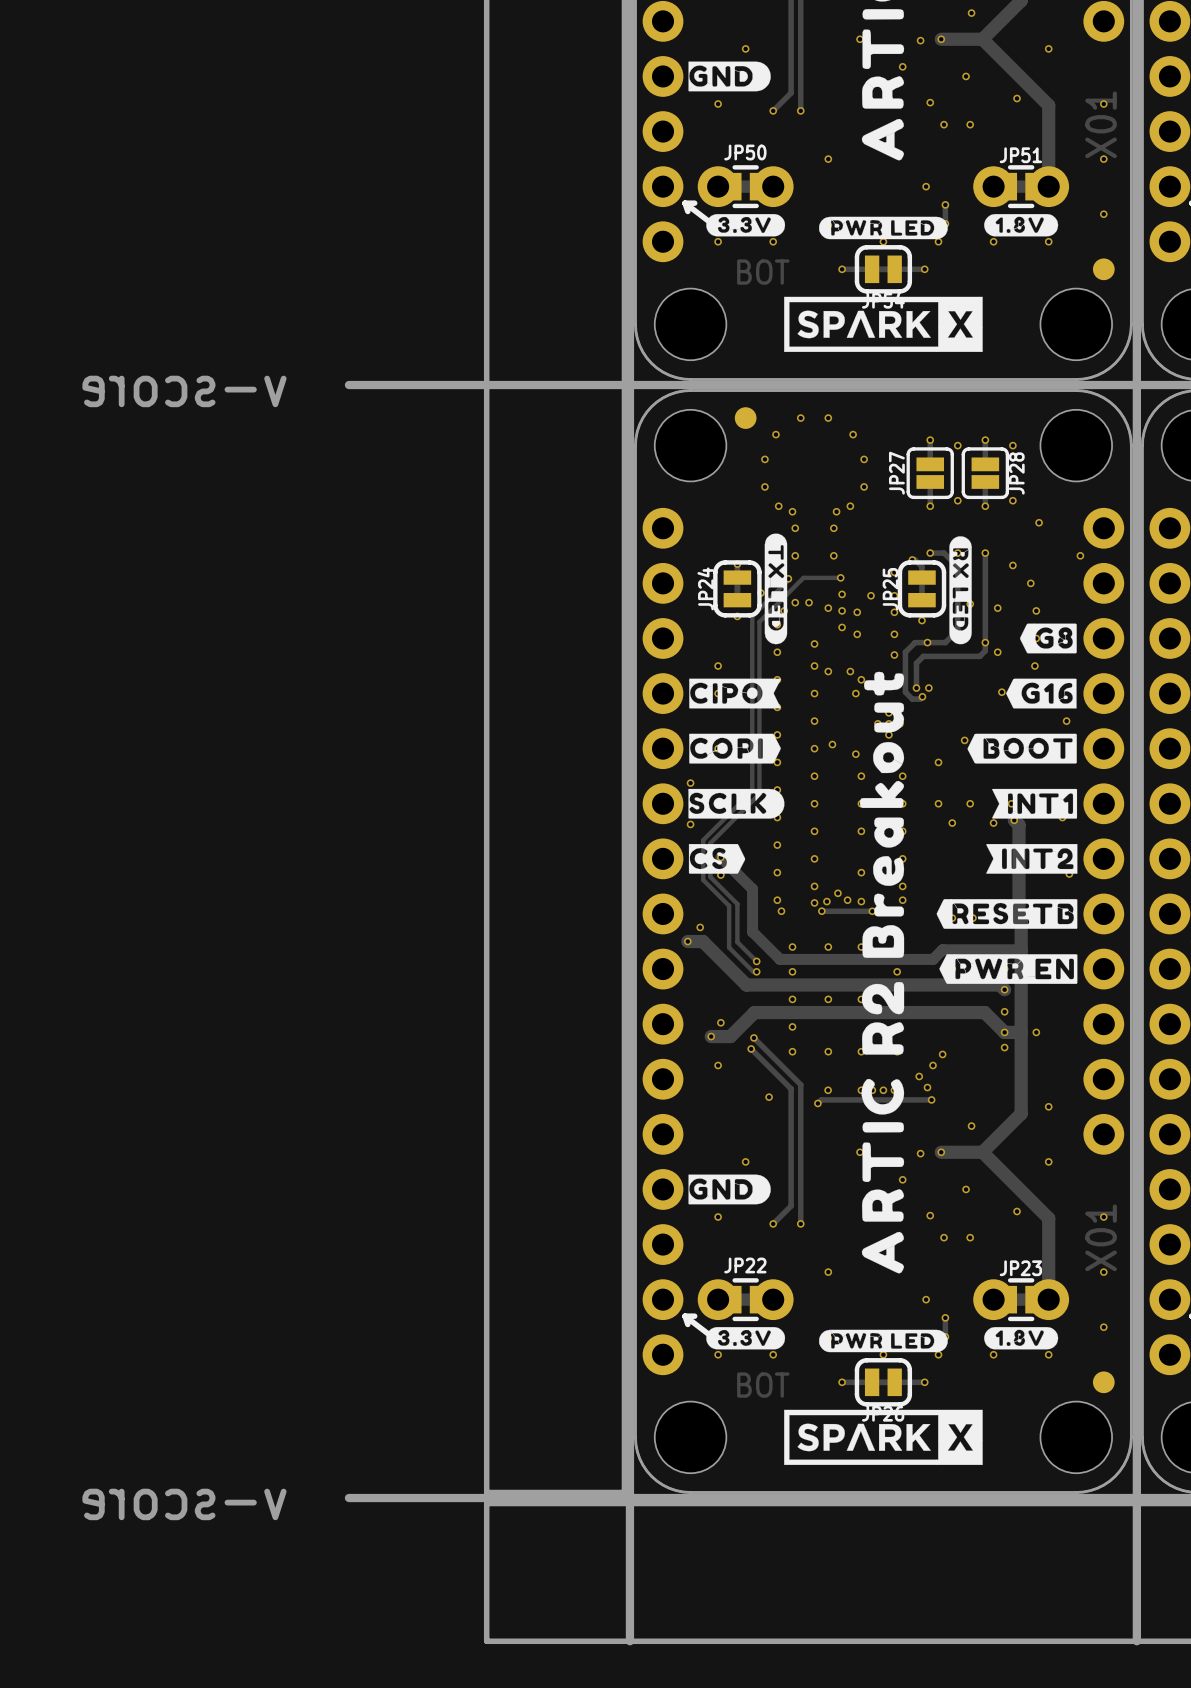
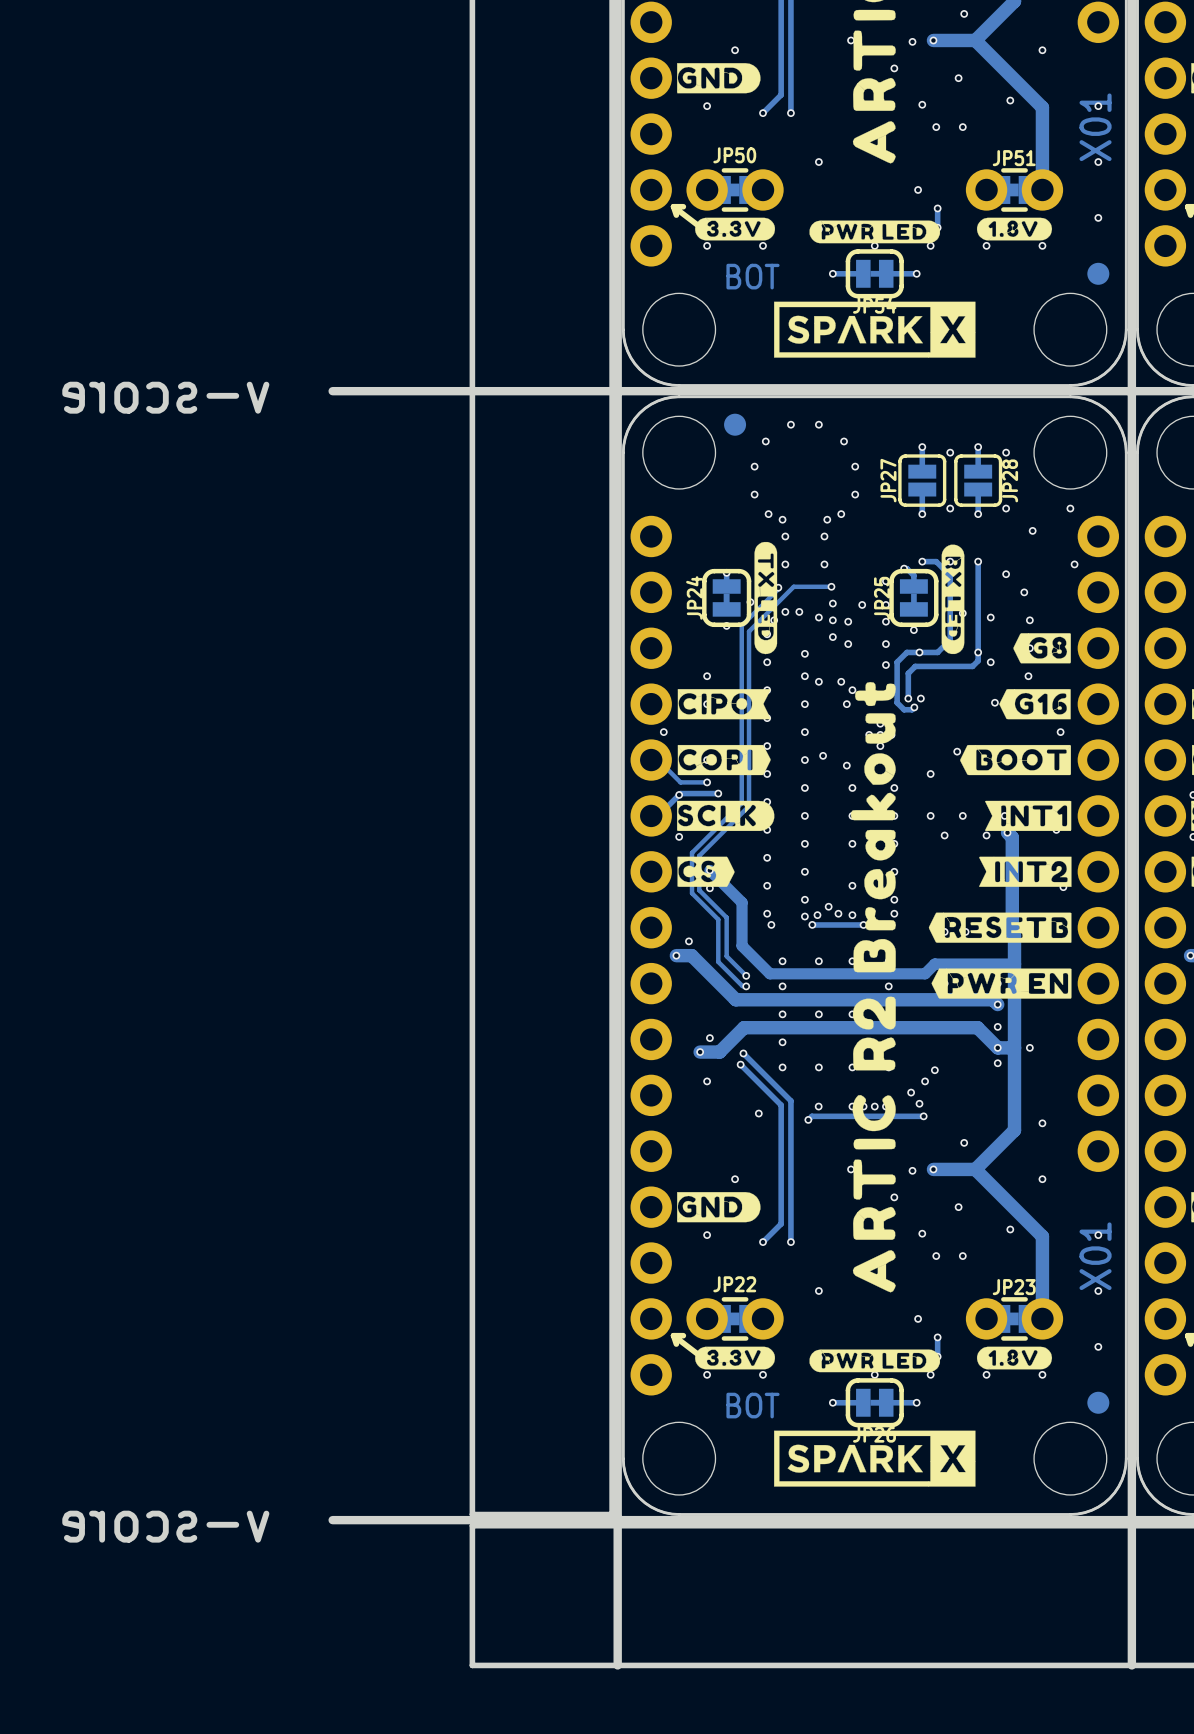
via: none -> (1070, 508)
via: none -> (663, 732)
track: none -> (651, 760) (658, 760) (680, 782) (707, 782)
via: none -> (707, 782)
track: none -> (718, 793) (680, 793) (658, 815) (651, 815)
via: none -> (718, 793)

